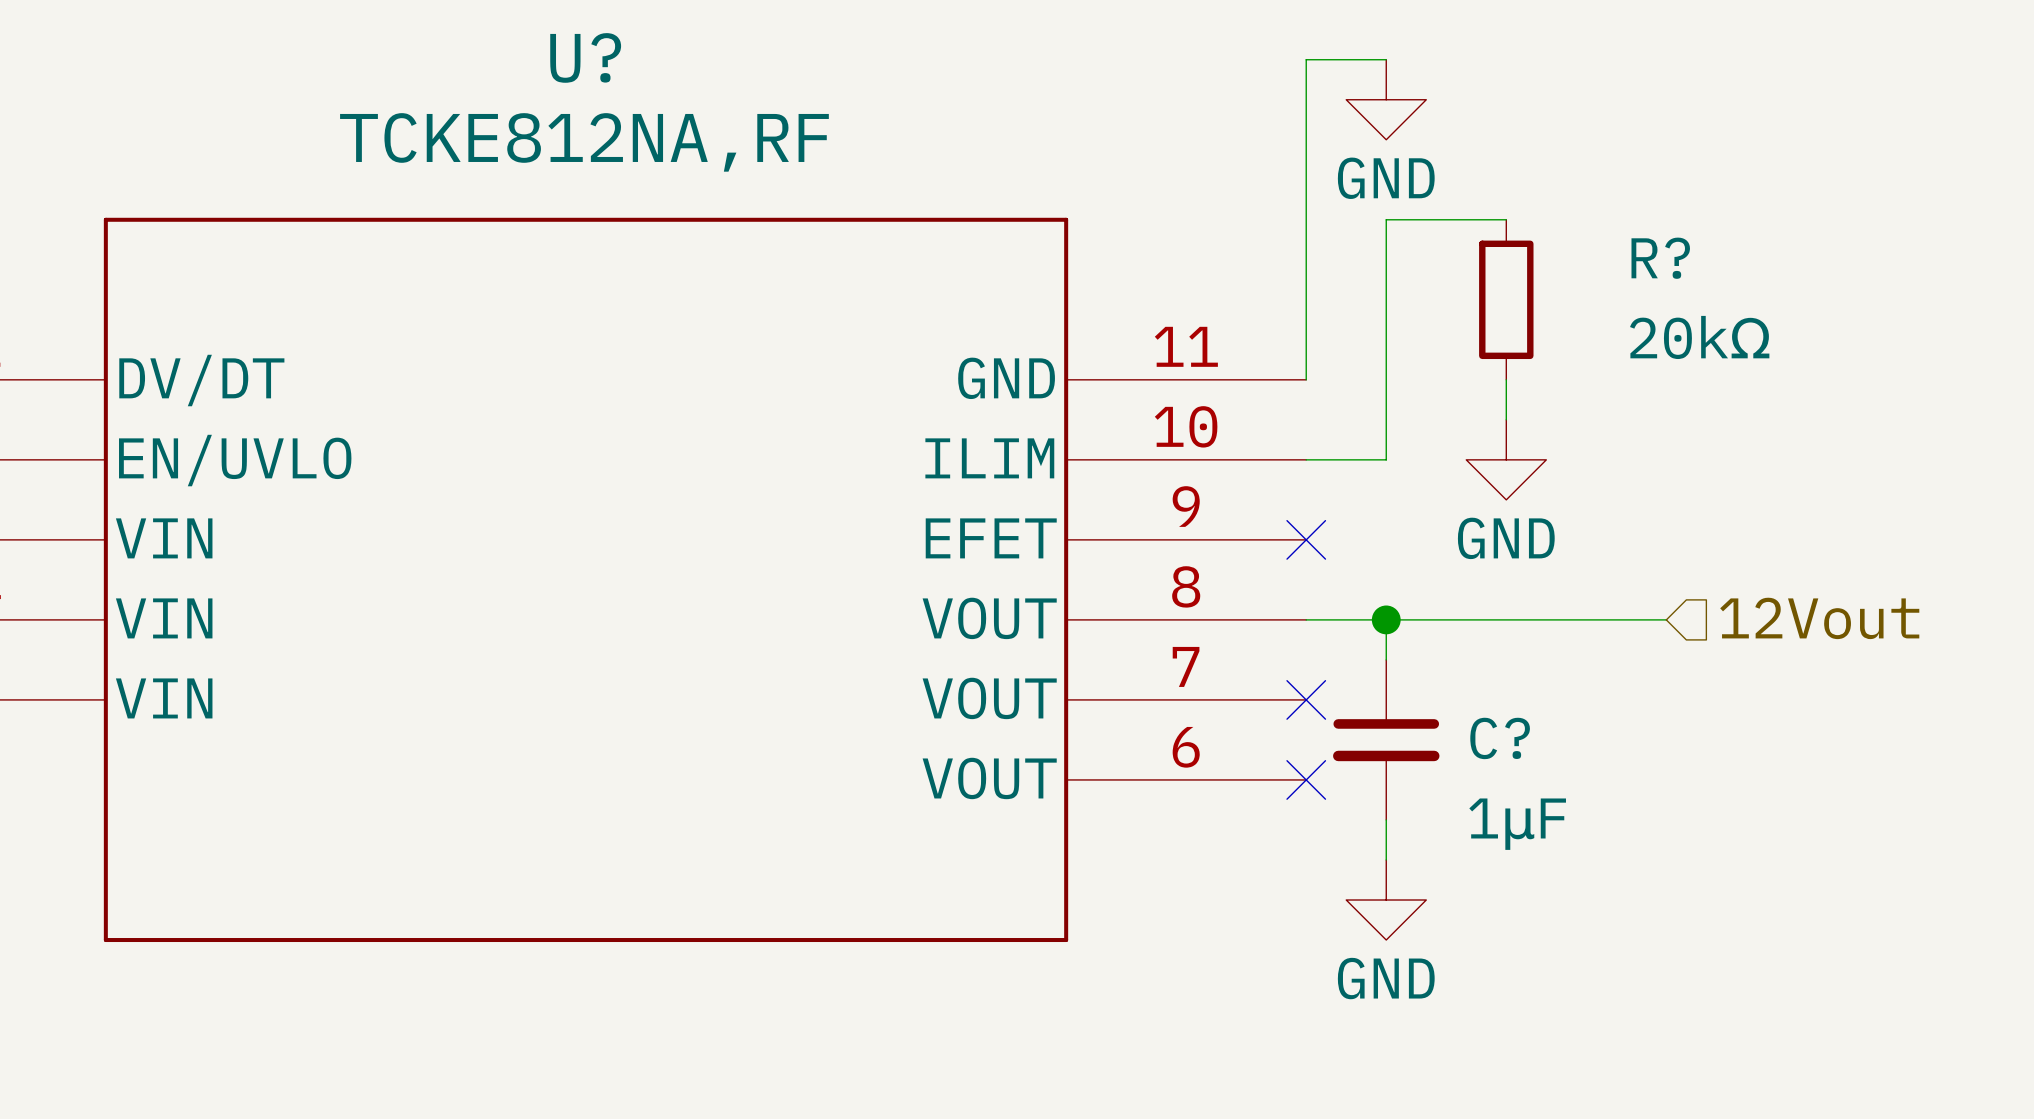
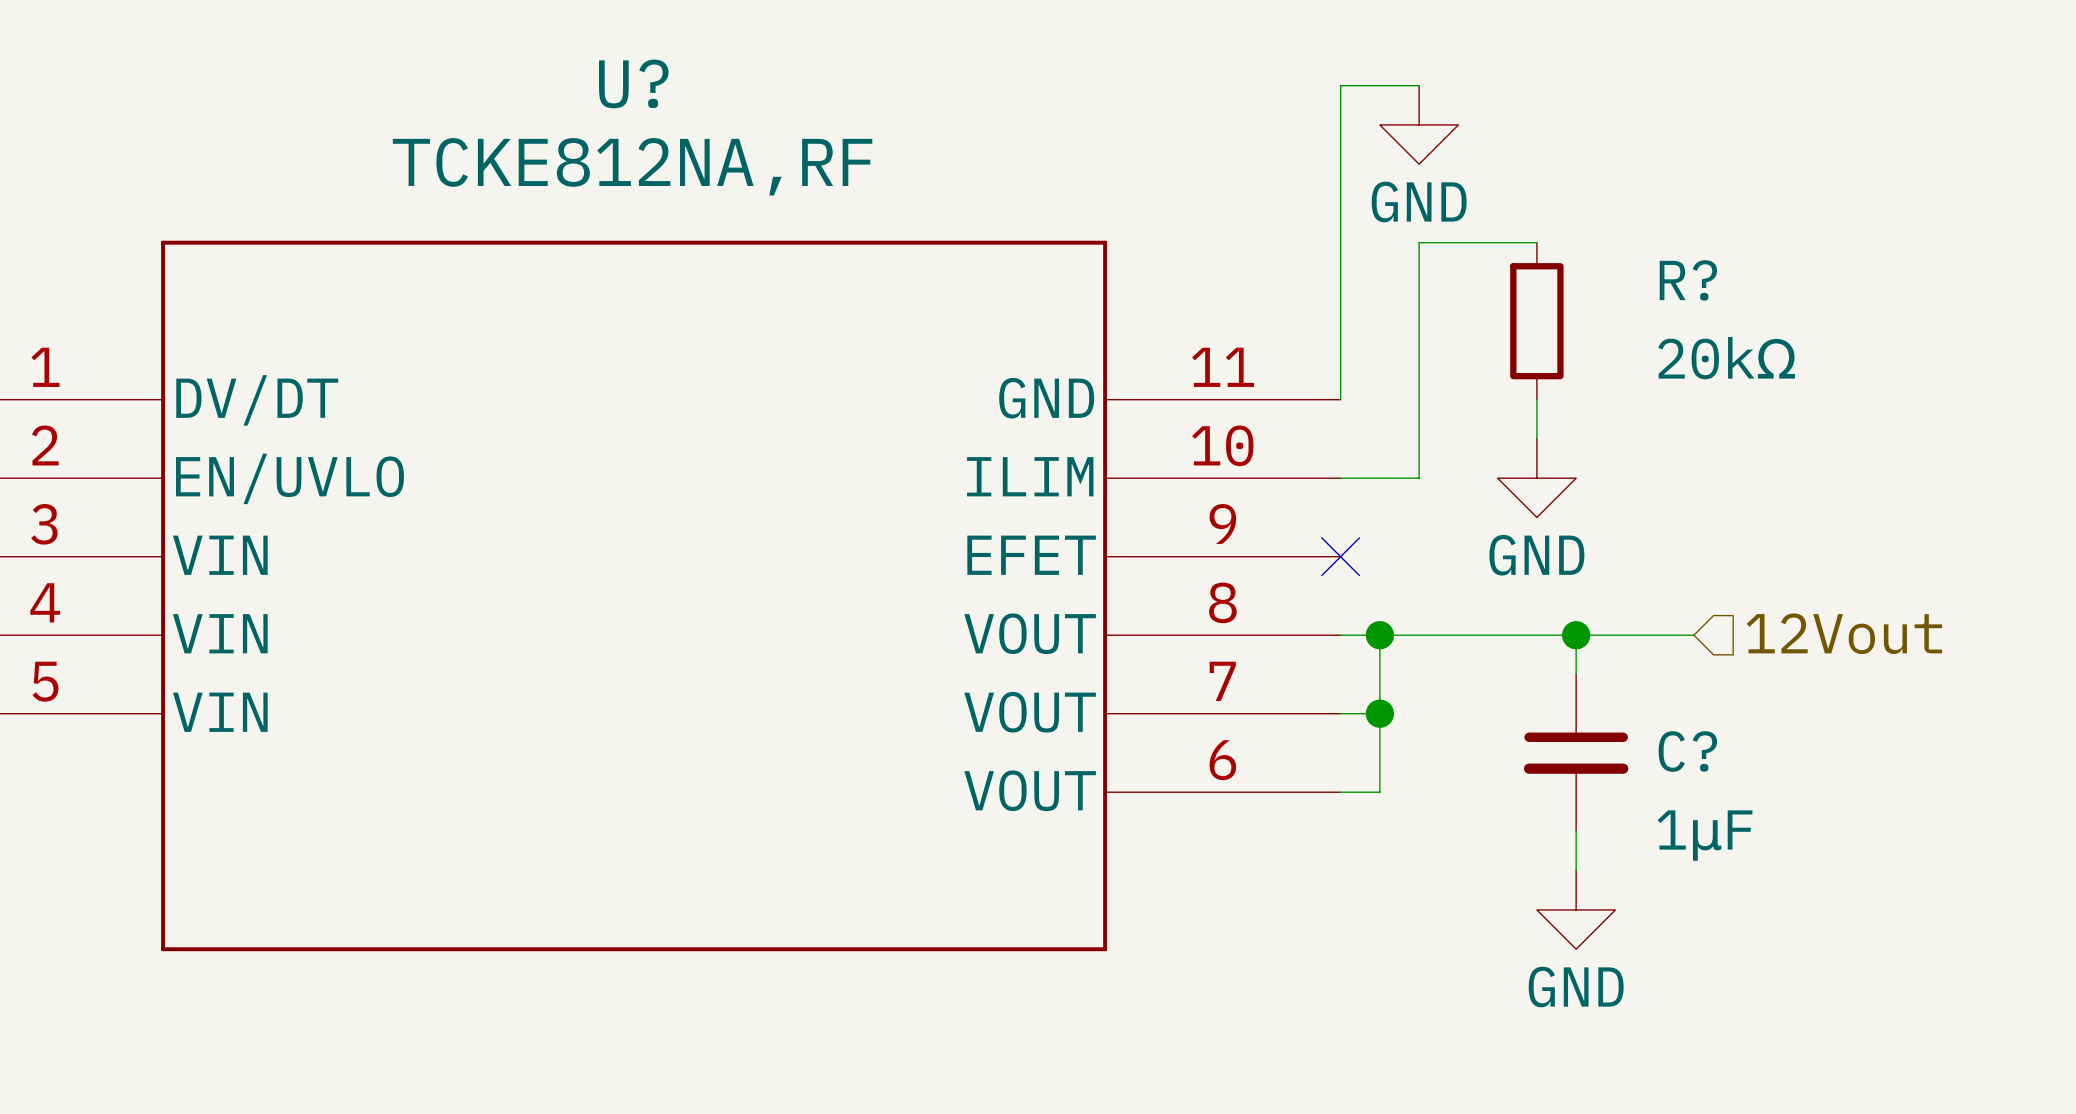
wire: none -> (1379, 635) (1379, 792) (1340, 792)
wire: (1386, 619) (1386, 659) -> (1576, 635) (1576, 674)
junction position: (1386, 619) -> (1379, 635)
junction: none -> (1576, 635)
wire: none -> (1340, 713) (1379, 713)
no-connect mark: (1306, 699) -> none
junction: none -> (1379, 713)
C? position: (1386, 739) -> (1576, 752)
no-connect mark: (1306, 779) -> none
wire: (1386, 819) (1386, 859) -> (1576, 831) (1576, 870)
power symbol position: GND (1386, 900) -> GND (1576, 909)

